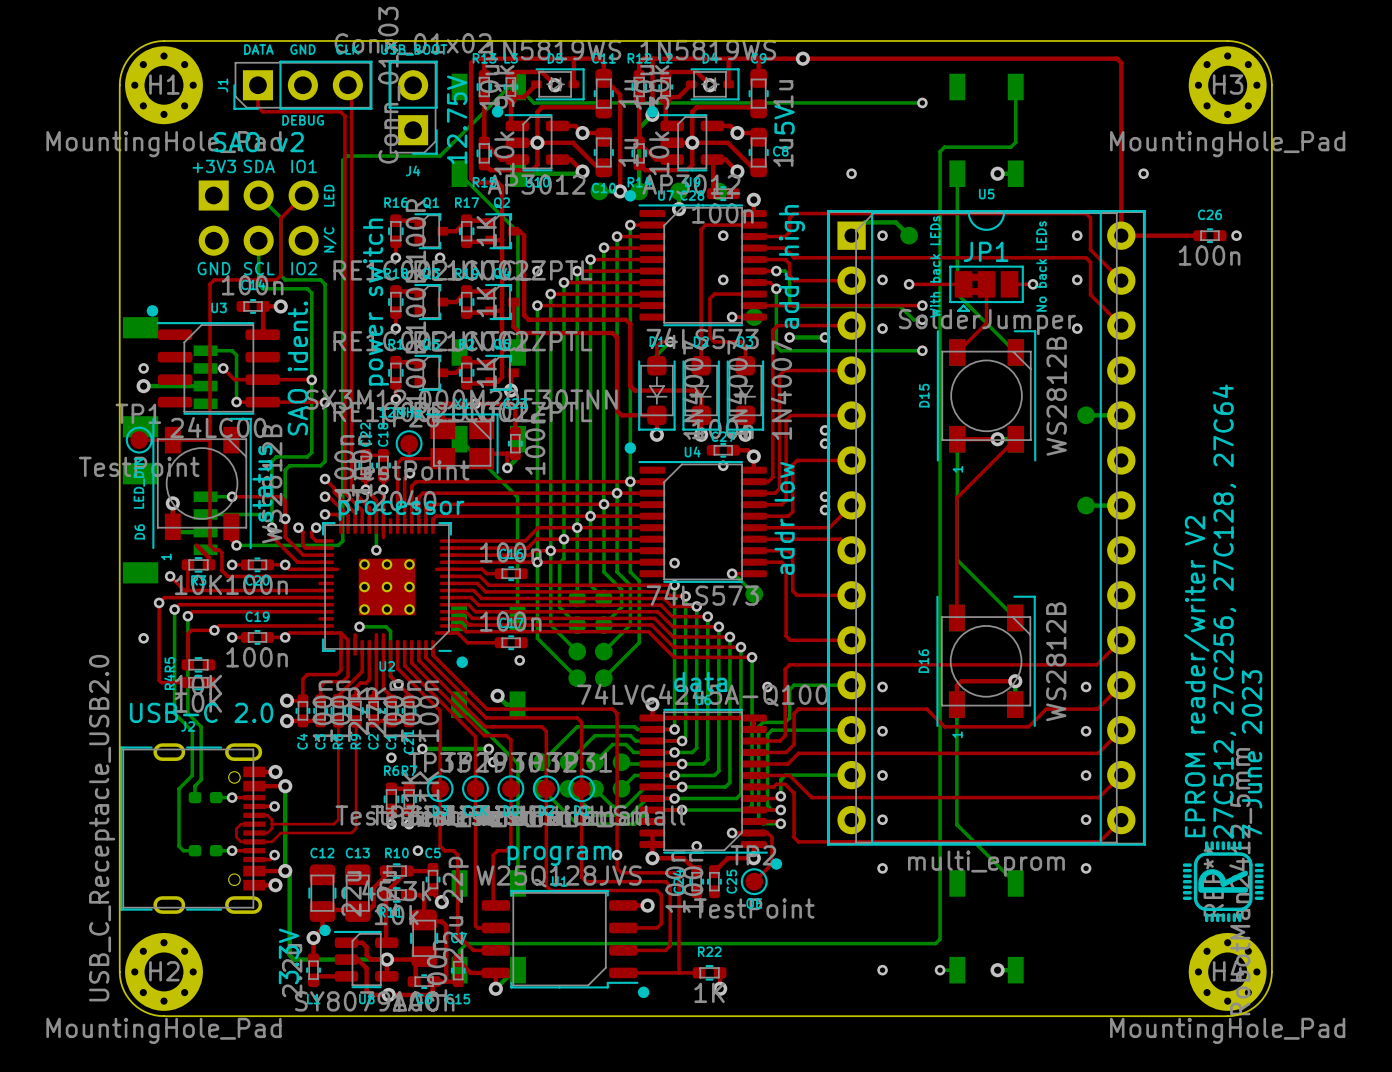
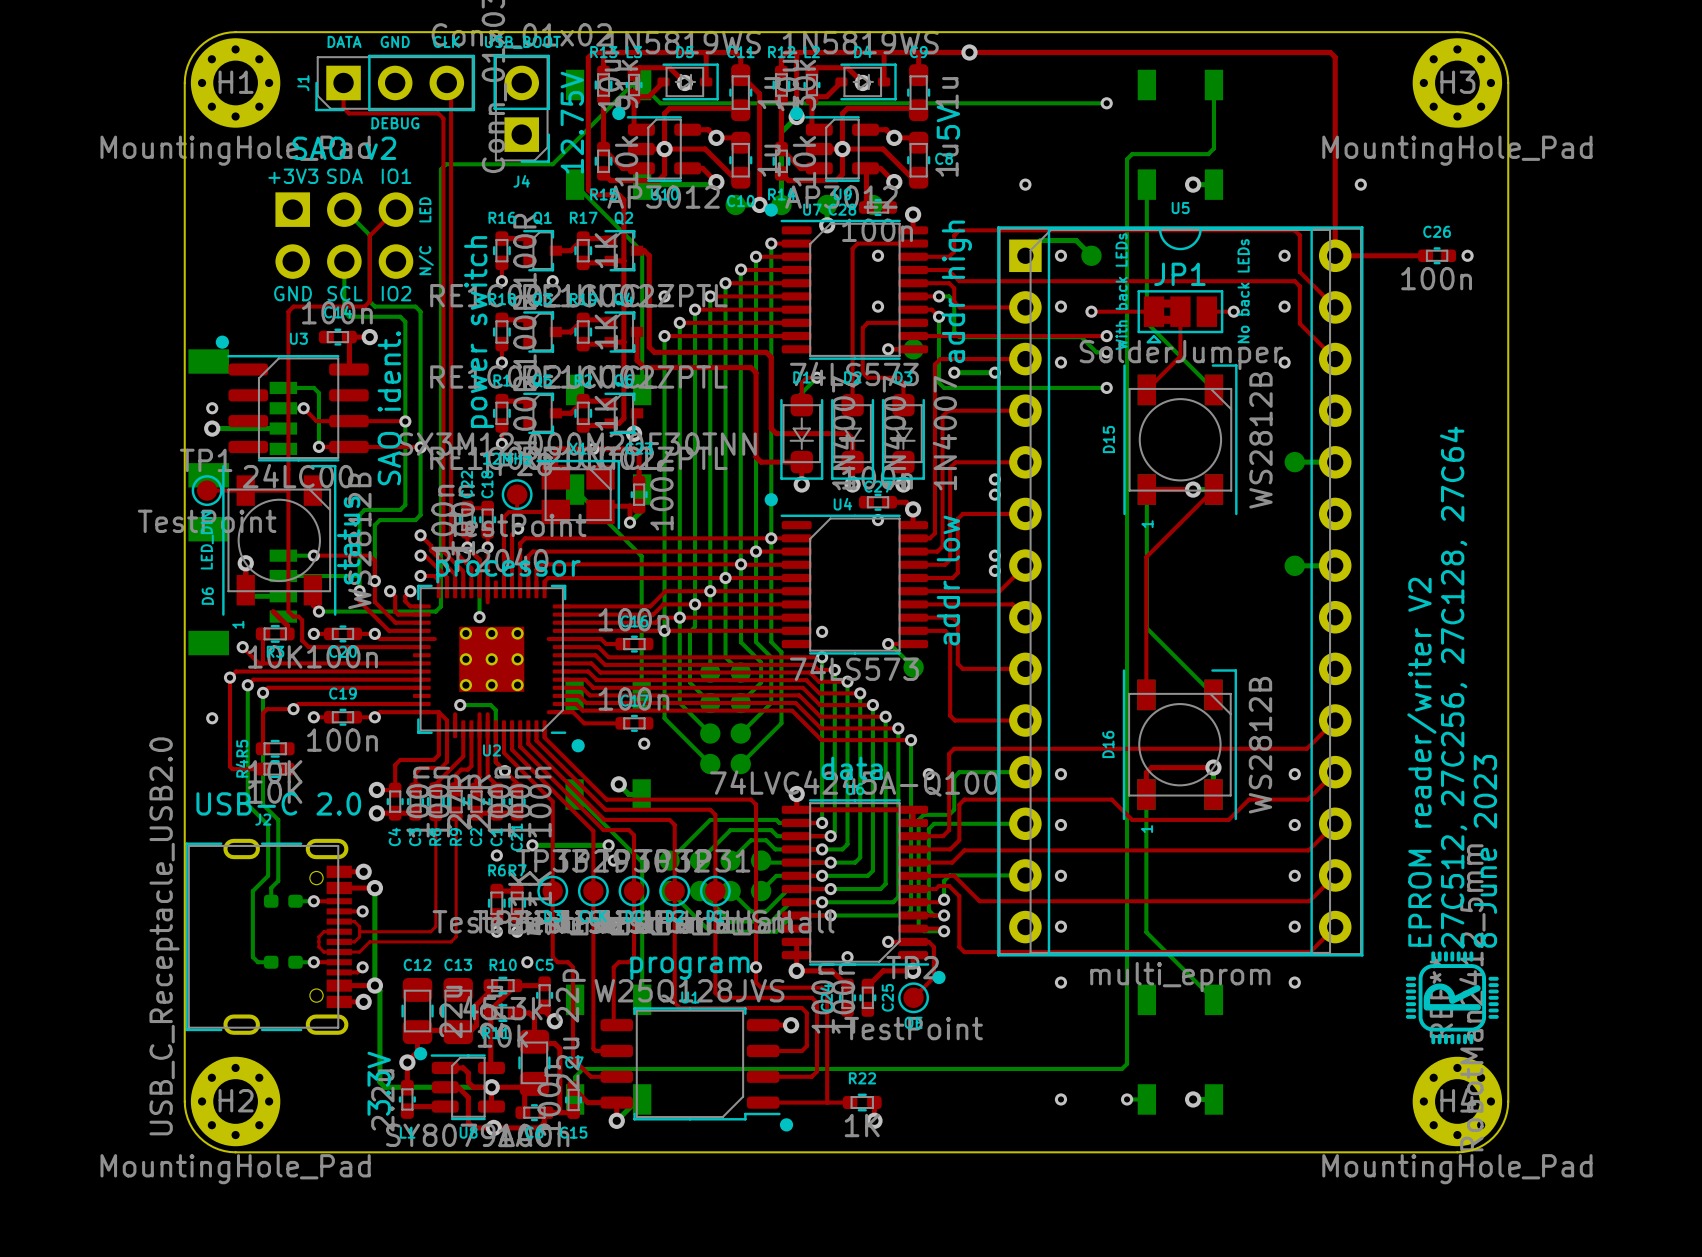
text: 7 June 2023 (1252, 754) -> 8 June 2023 (1485, 851)

